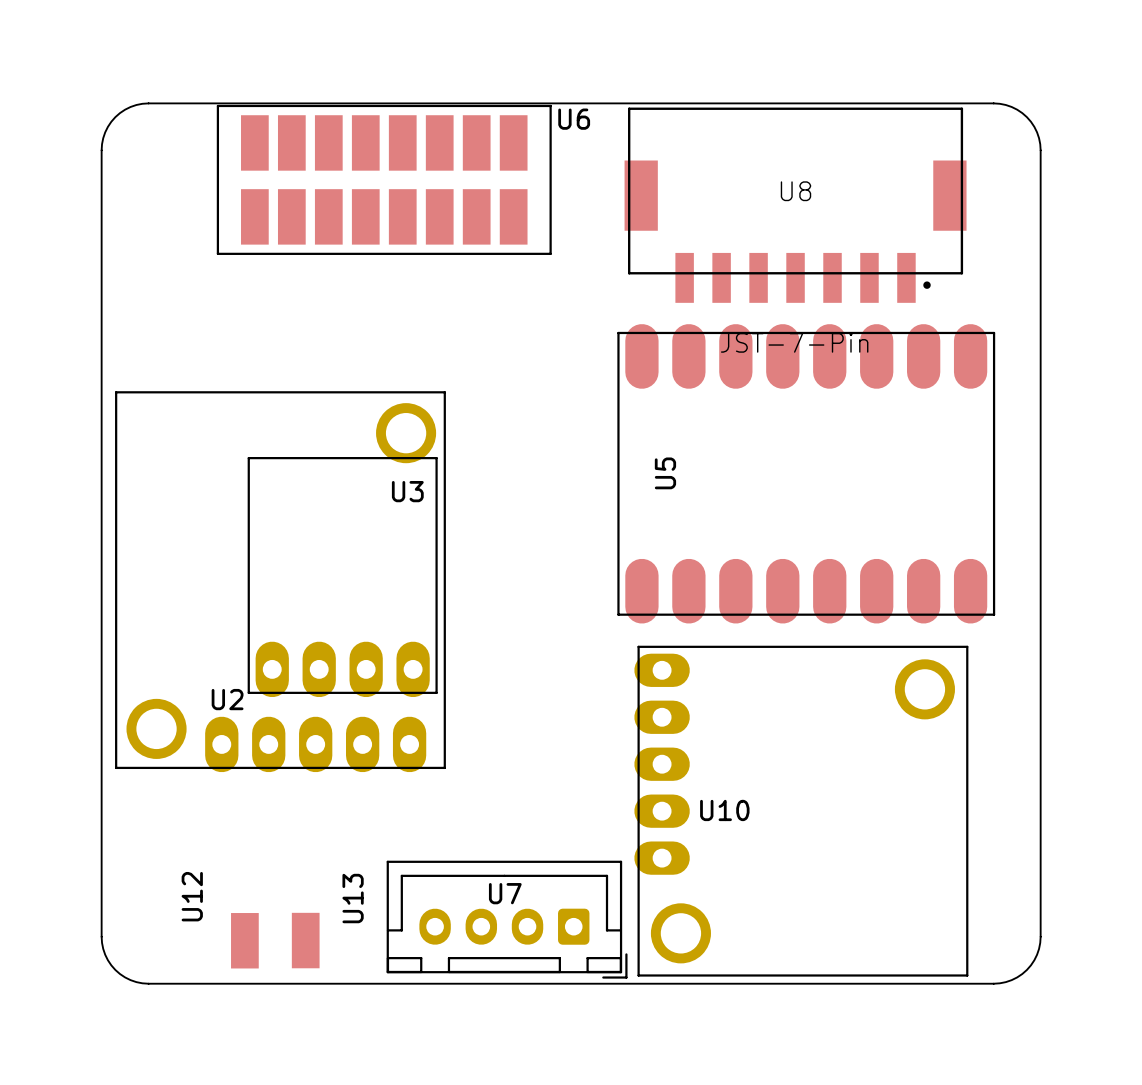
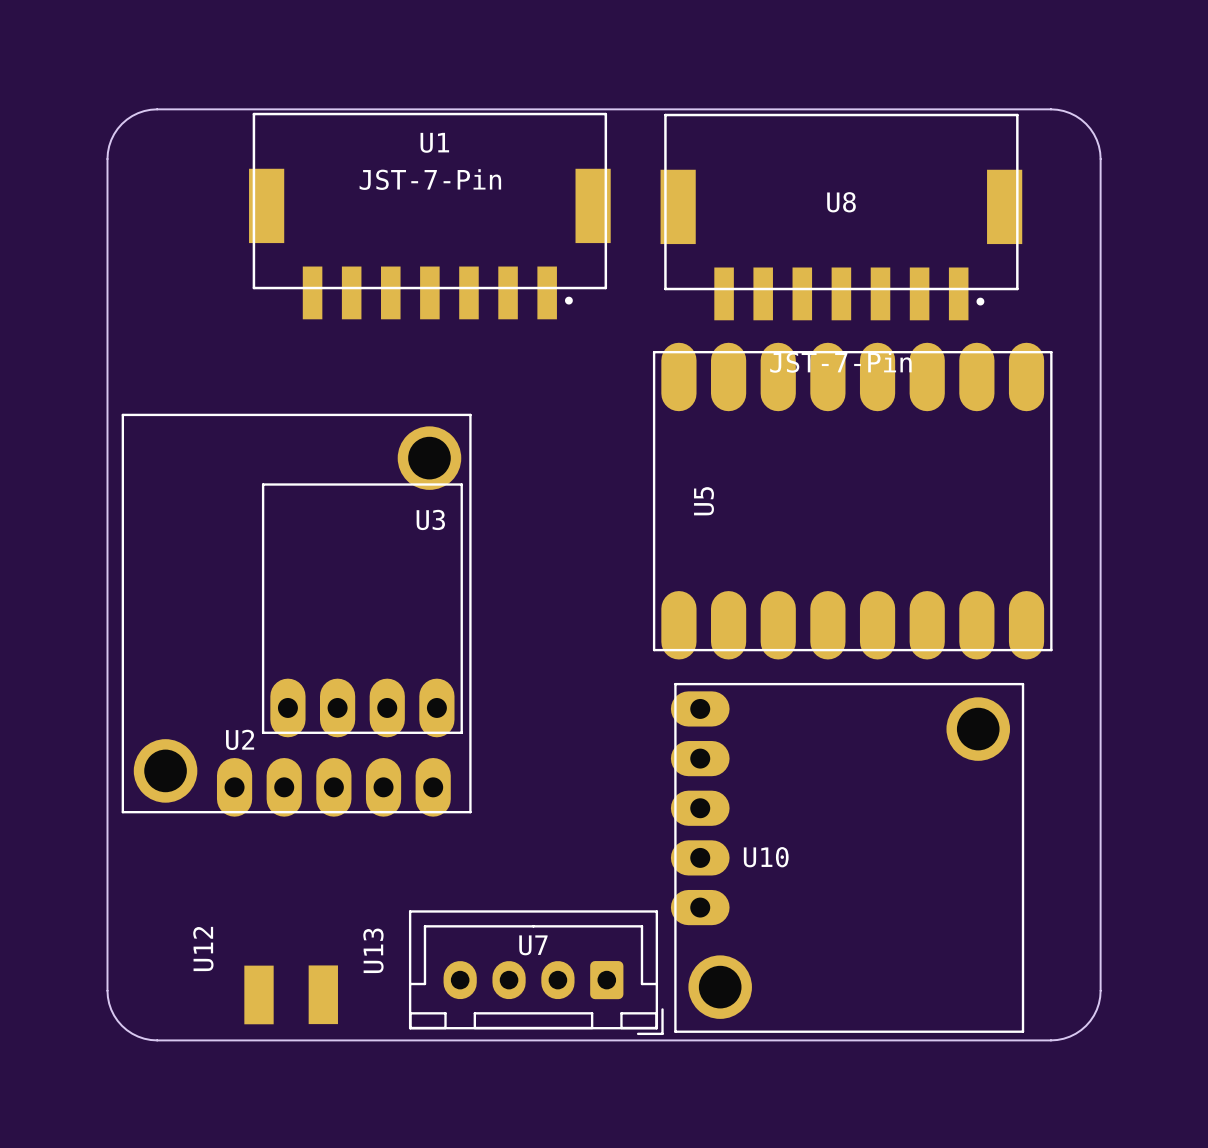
U6: (384, 179) -> none
U1: none -> JST-7-Pin (429, 216)

